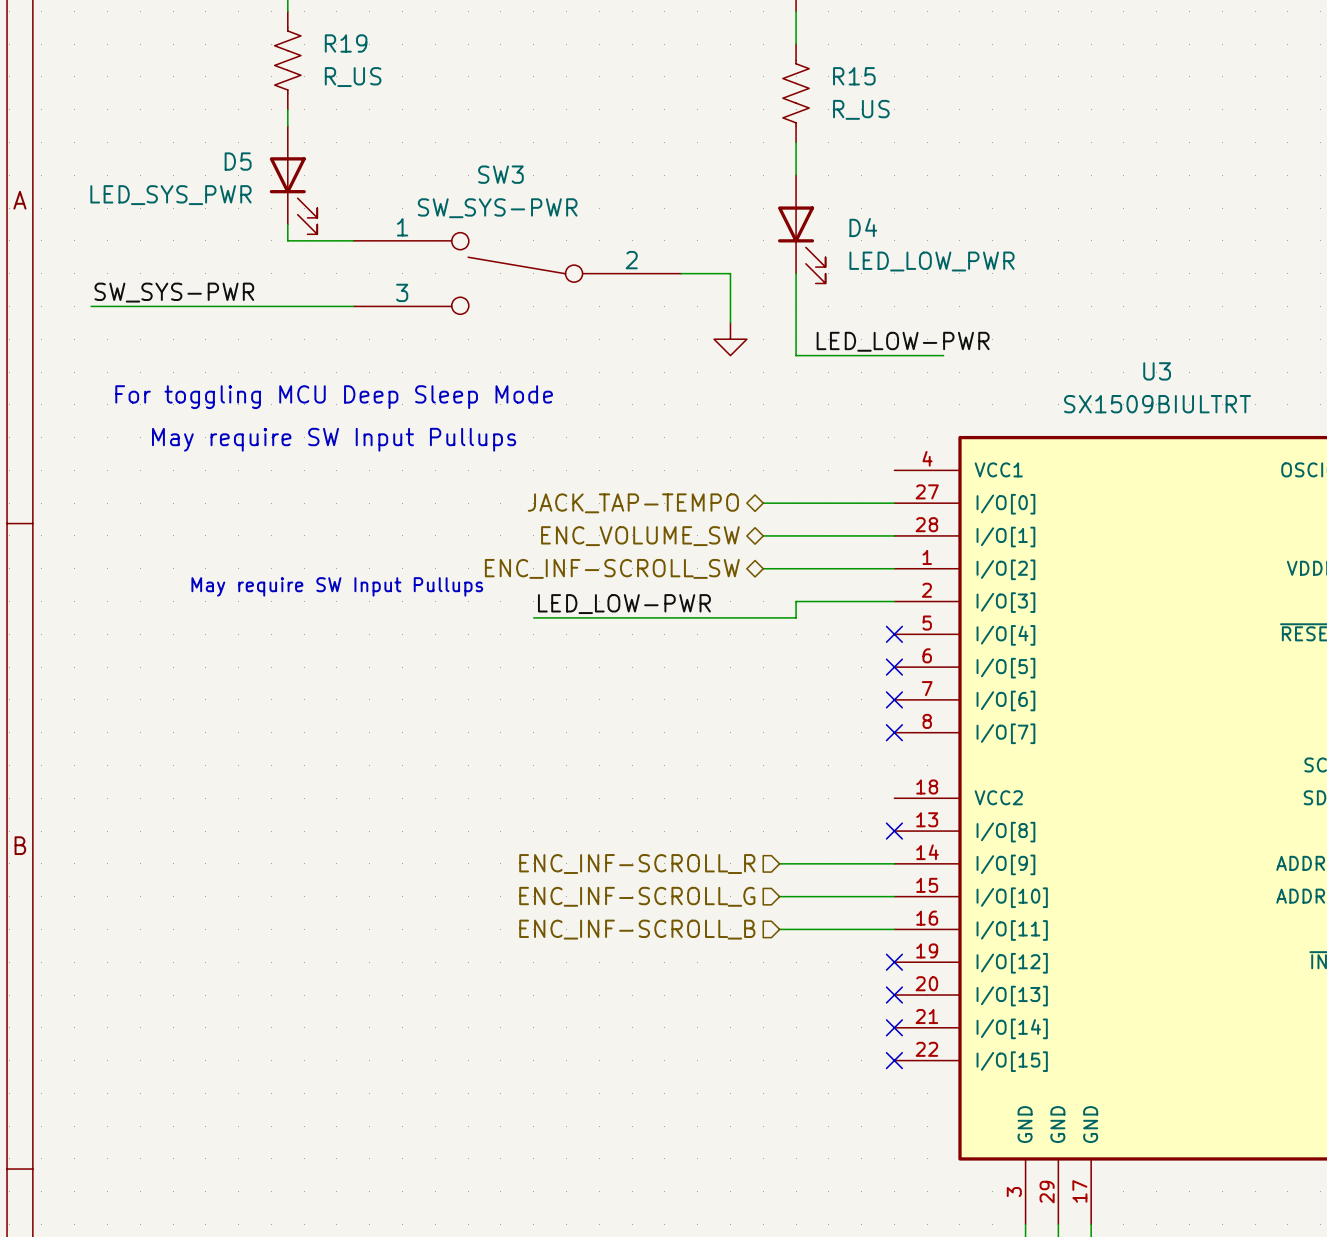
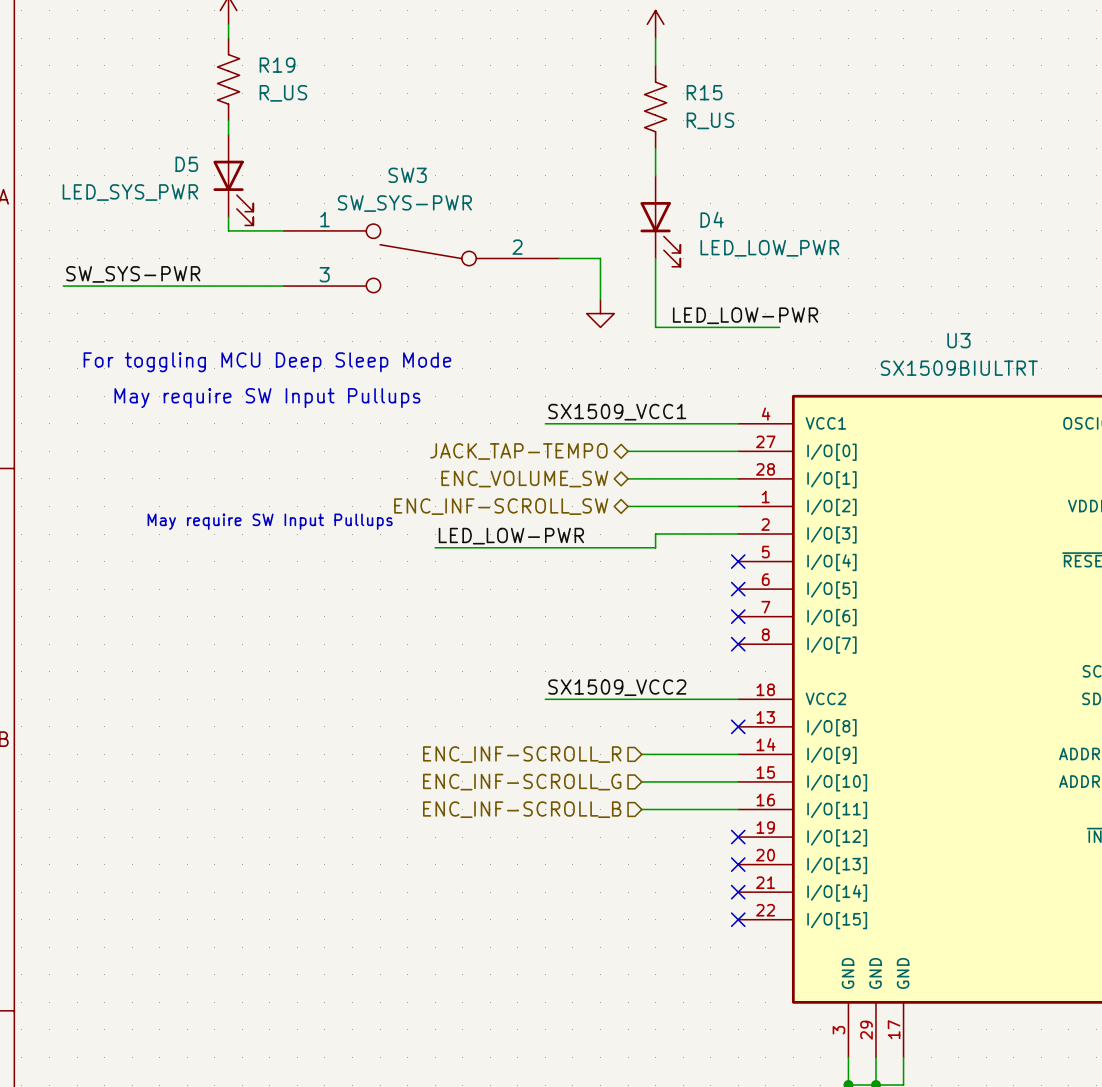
label: none -> SX1509_VCC1 (617, 412)
wire: none -> (545, 423) (738, 423)
label: none -> SX1509_VCC2 (617, 687)
wire: none -> (545, 699) (738, 699)

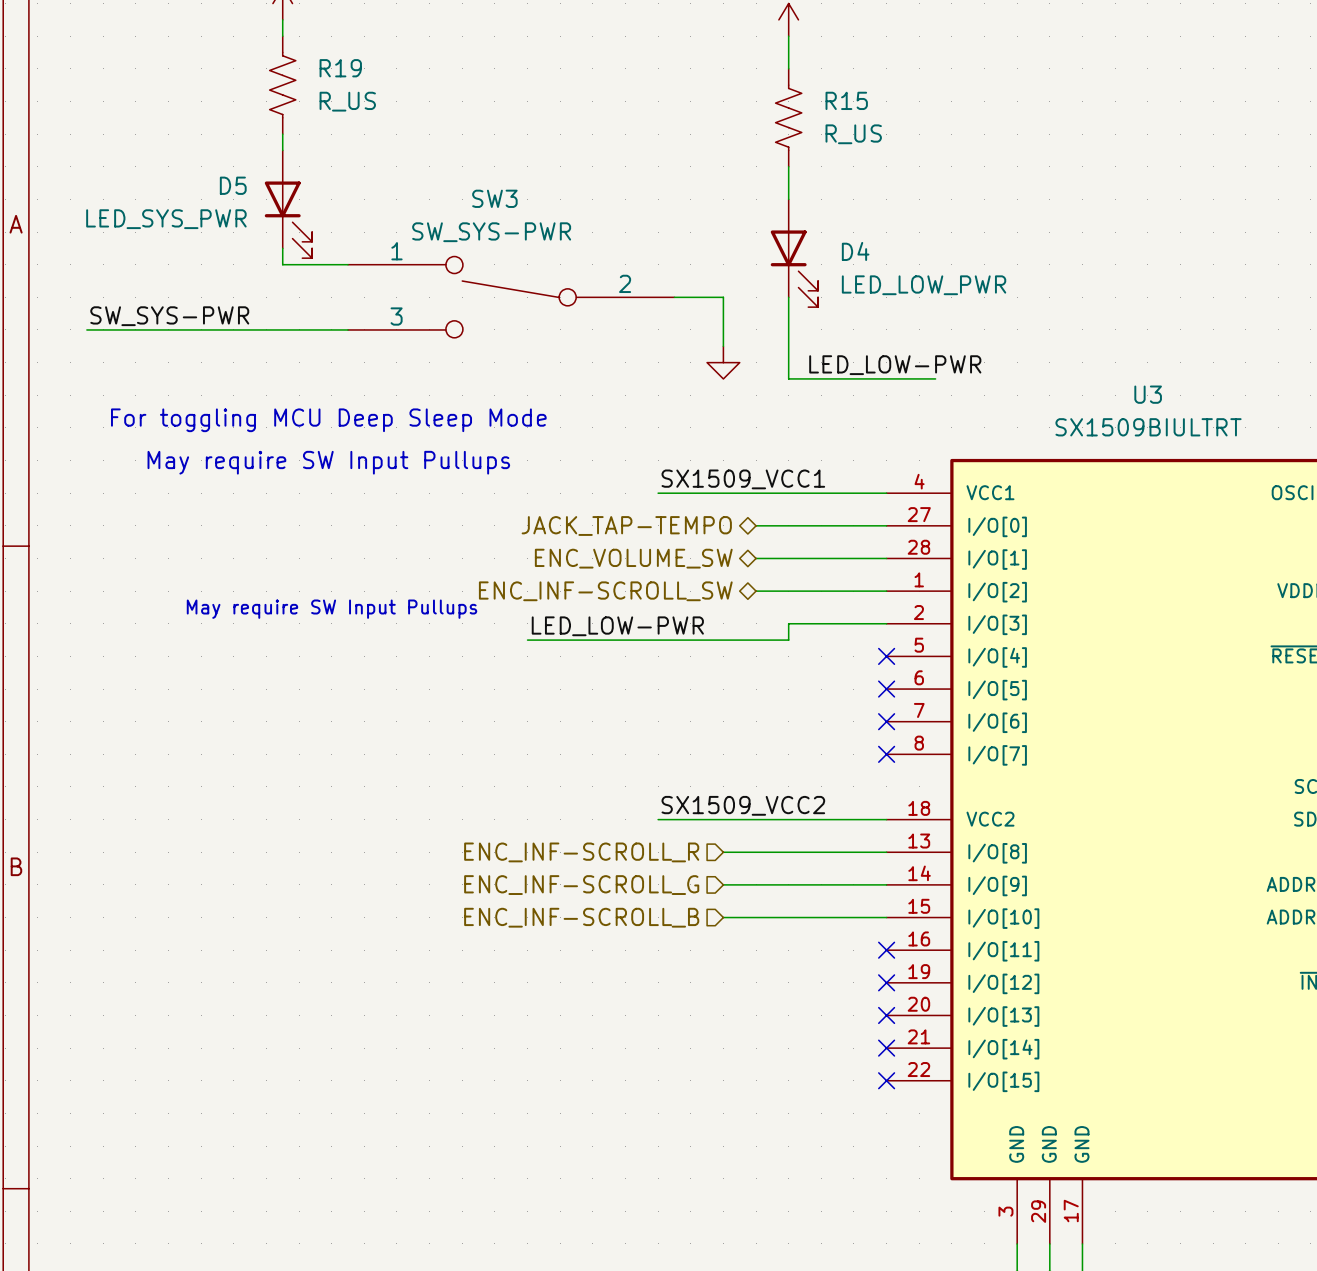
wire: none -> (723, 852) (886, 852)
no-connect mark: (738, 726) -> none
hierarchical label position: ENC_INF-SCROLL_R (522, 754) -> ENC_INF-SCROLL_R (581, 852)
wire: none -> (723, 884) (772, 884)
wire: none -> (723, 917) (772, 917)
hierarchical label position: ENC_INF-SCROLL_G (522, 782) -> ENC_INF-SCROLL_G (581, 885)
hierarchical label position: ENC_INF-SCROLL_B (522, 809) -> ENC_INF-SCROLL_B (581, 917)
wire: (641, 809) (738, 809) -> none
no-connect mark: none -> (886, 950)

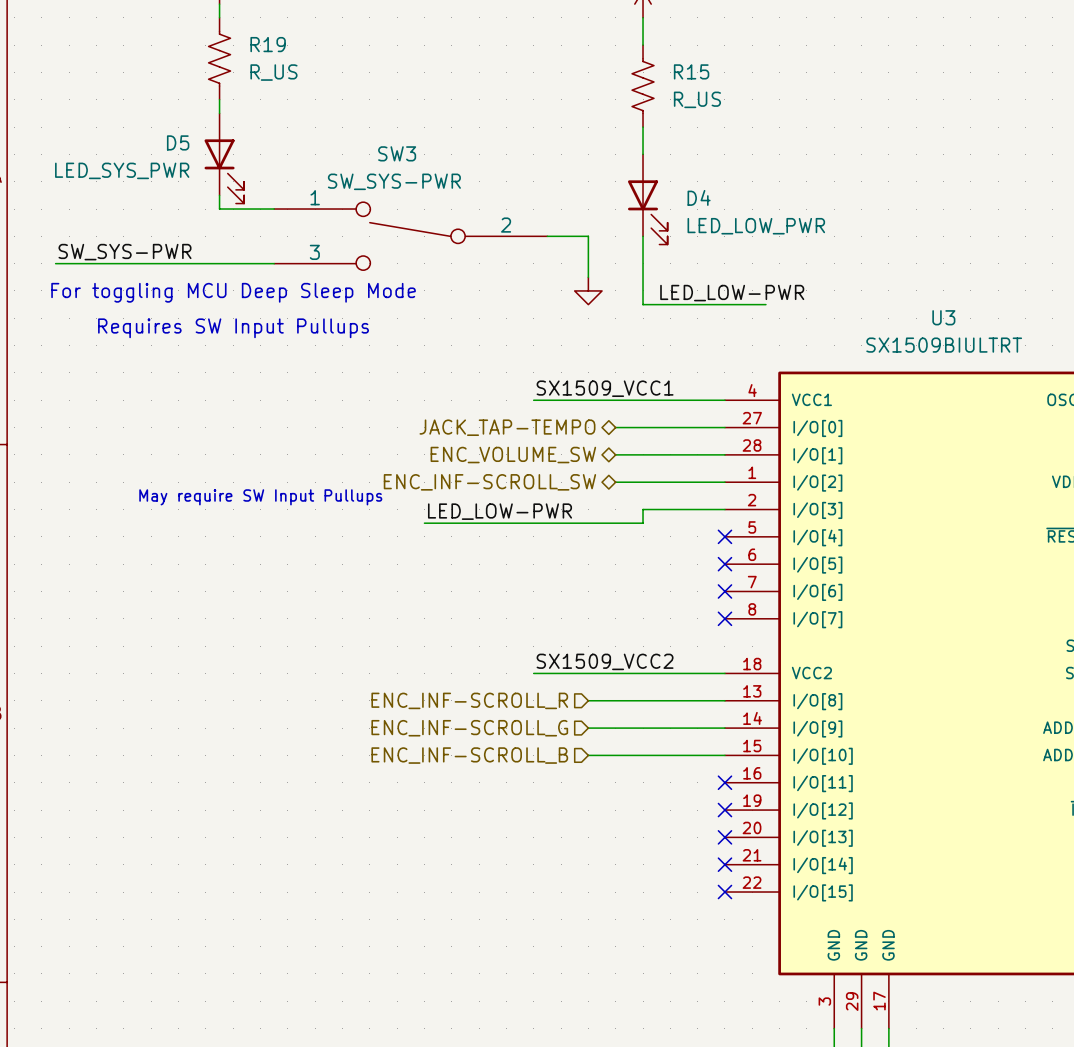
text: none -> Requires SW Input Pullups (233, 328)
text position: For toggling MCU Deep Sleep Mode (328, 420) -> For toggling MCU Deep Sleep Mode (233, 292)
text: May require SW Input Pullups (328, 462) -> none

